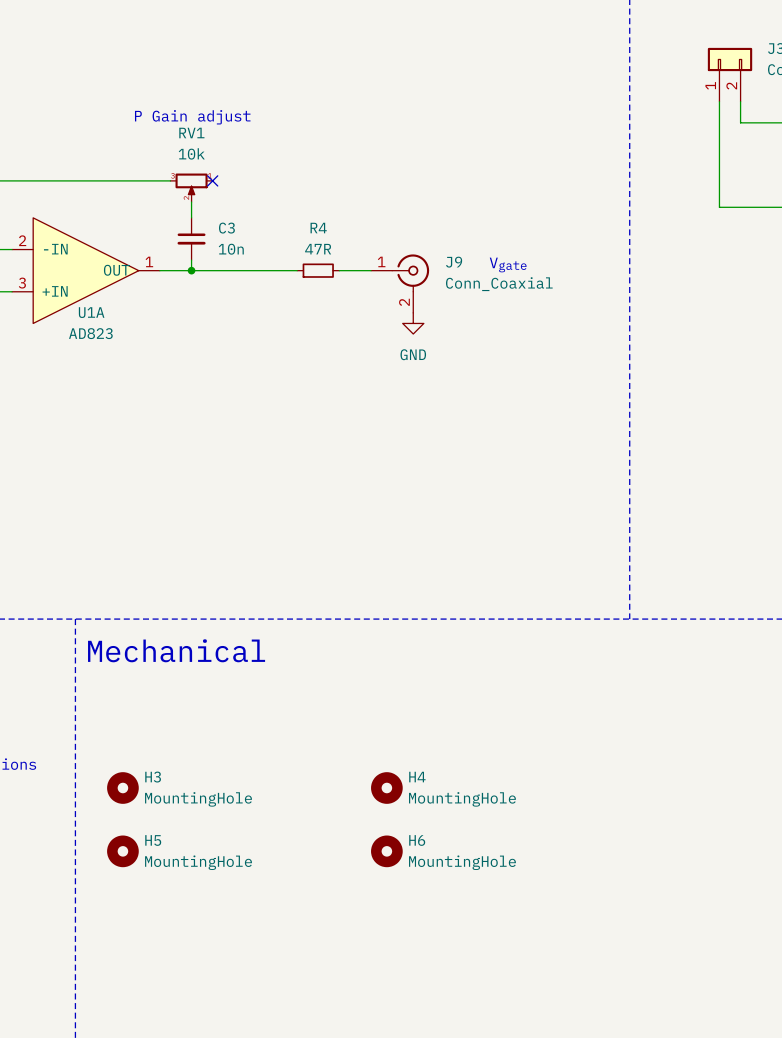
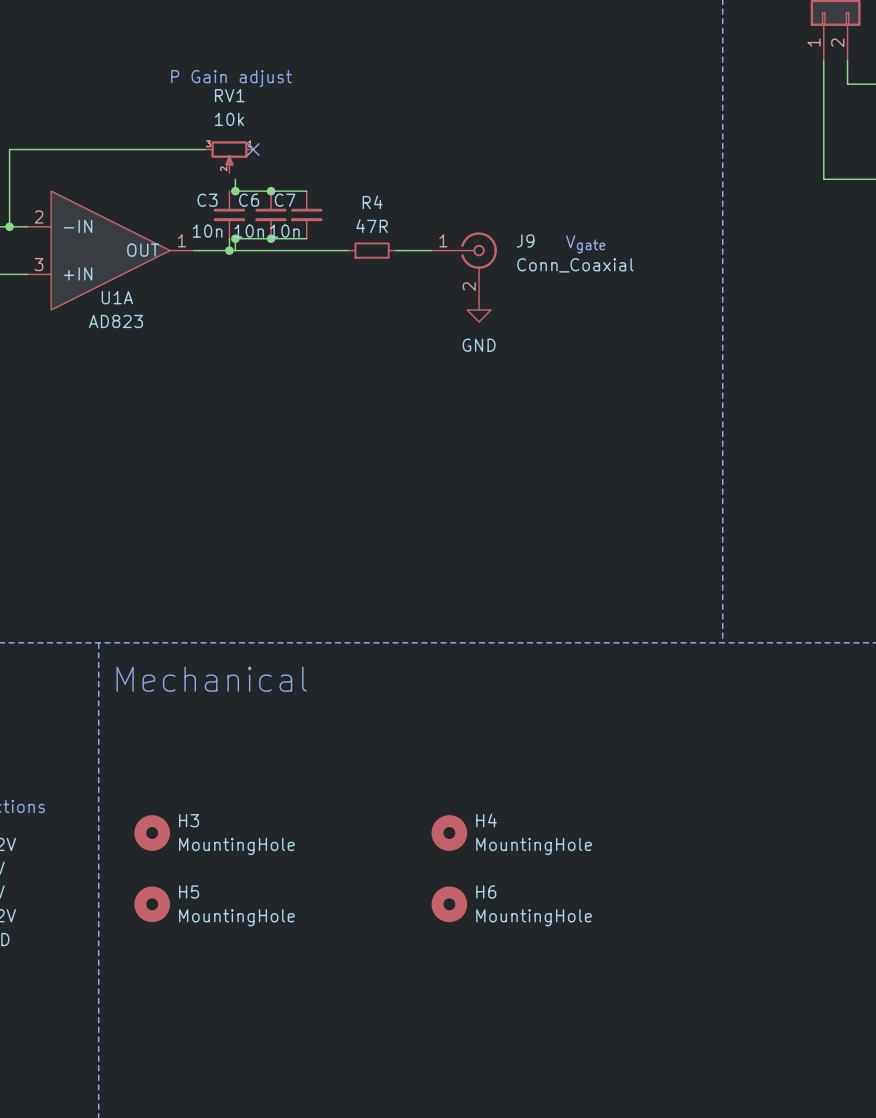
wire: (191, 202) (191, 217) -> none
wire: none -> (235, 179) (235, 191) (306, 191)
junction: none -> (235, 191)
junction: none -> (271, 191)
C3 name position: C3 (226, 228) -> C3 (207, 200)
C6: none -> 10n (271, 214)
C7: none -> 10n (306, 214)
C3 value position: 10n (231, 249) -> 10n (207, 231)
junction: none -> (235, 238)
junction: none -> (271, 238)
wire: none -> (306, 238) (235, 238) (235, 250)

